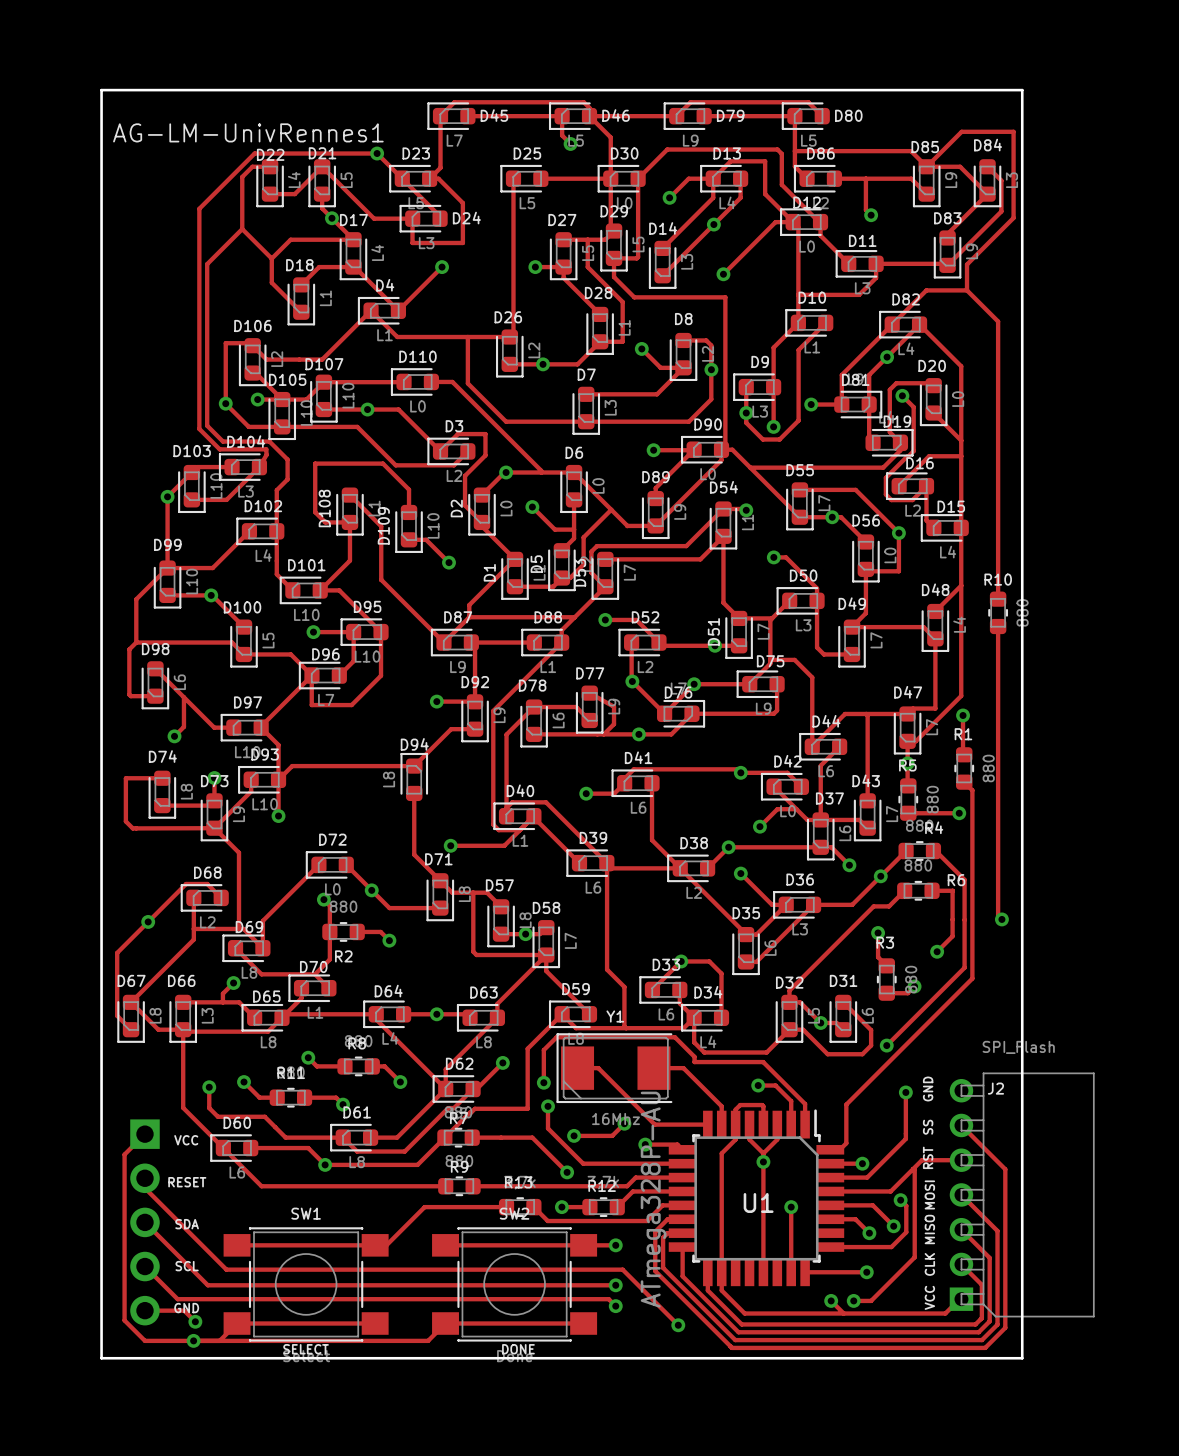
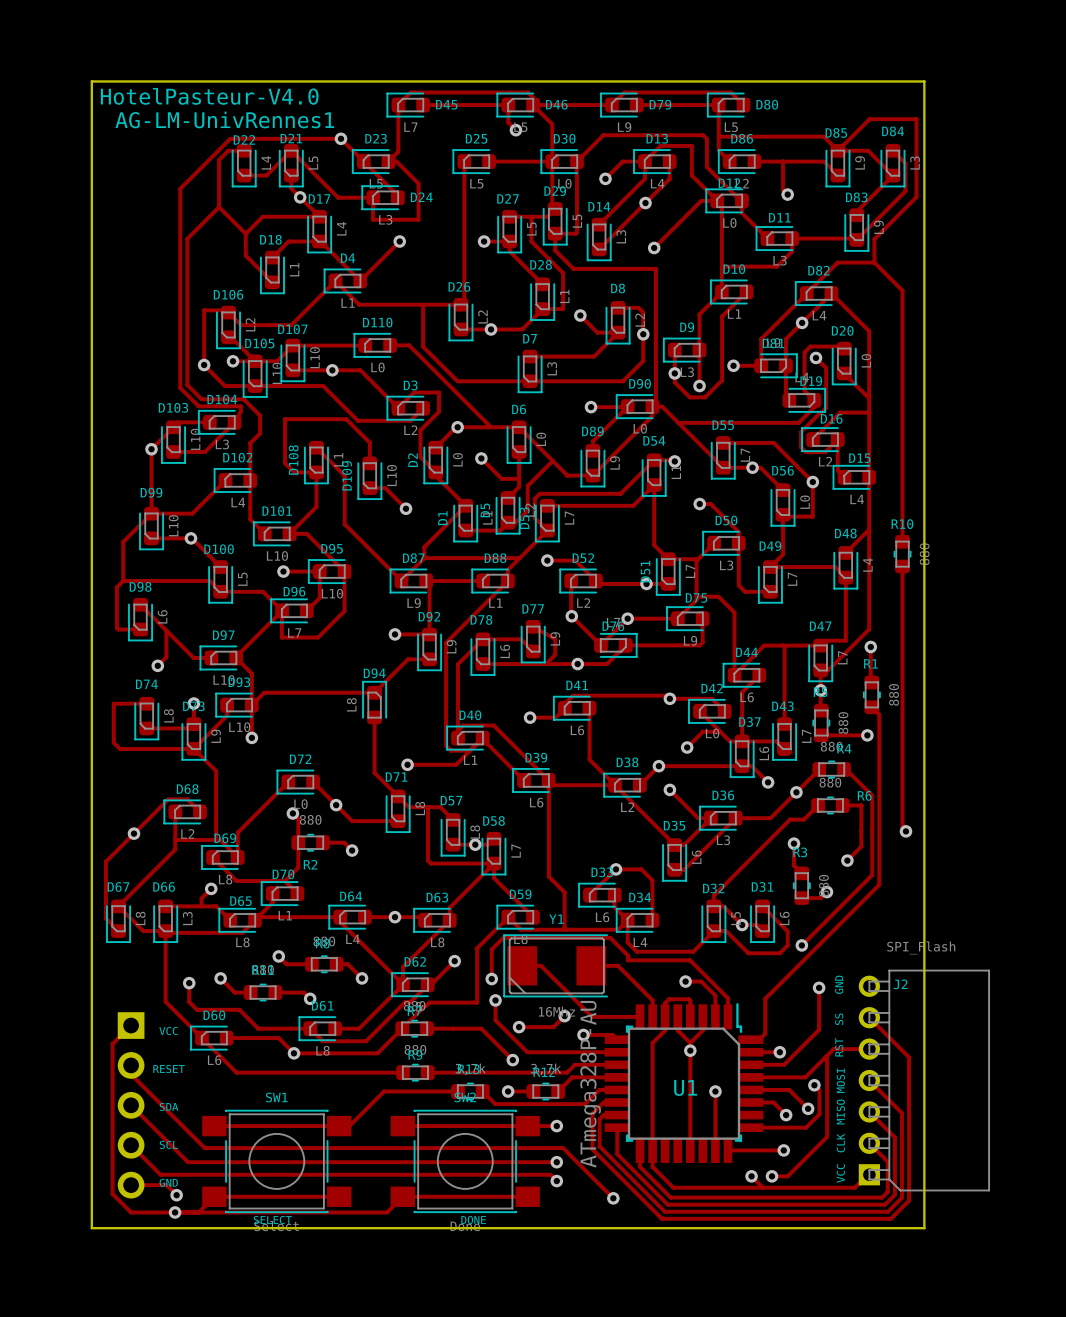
drawing: none -> [100, 87, 319, 105]

